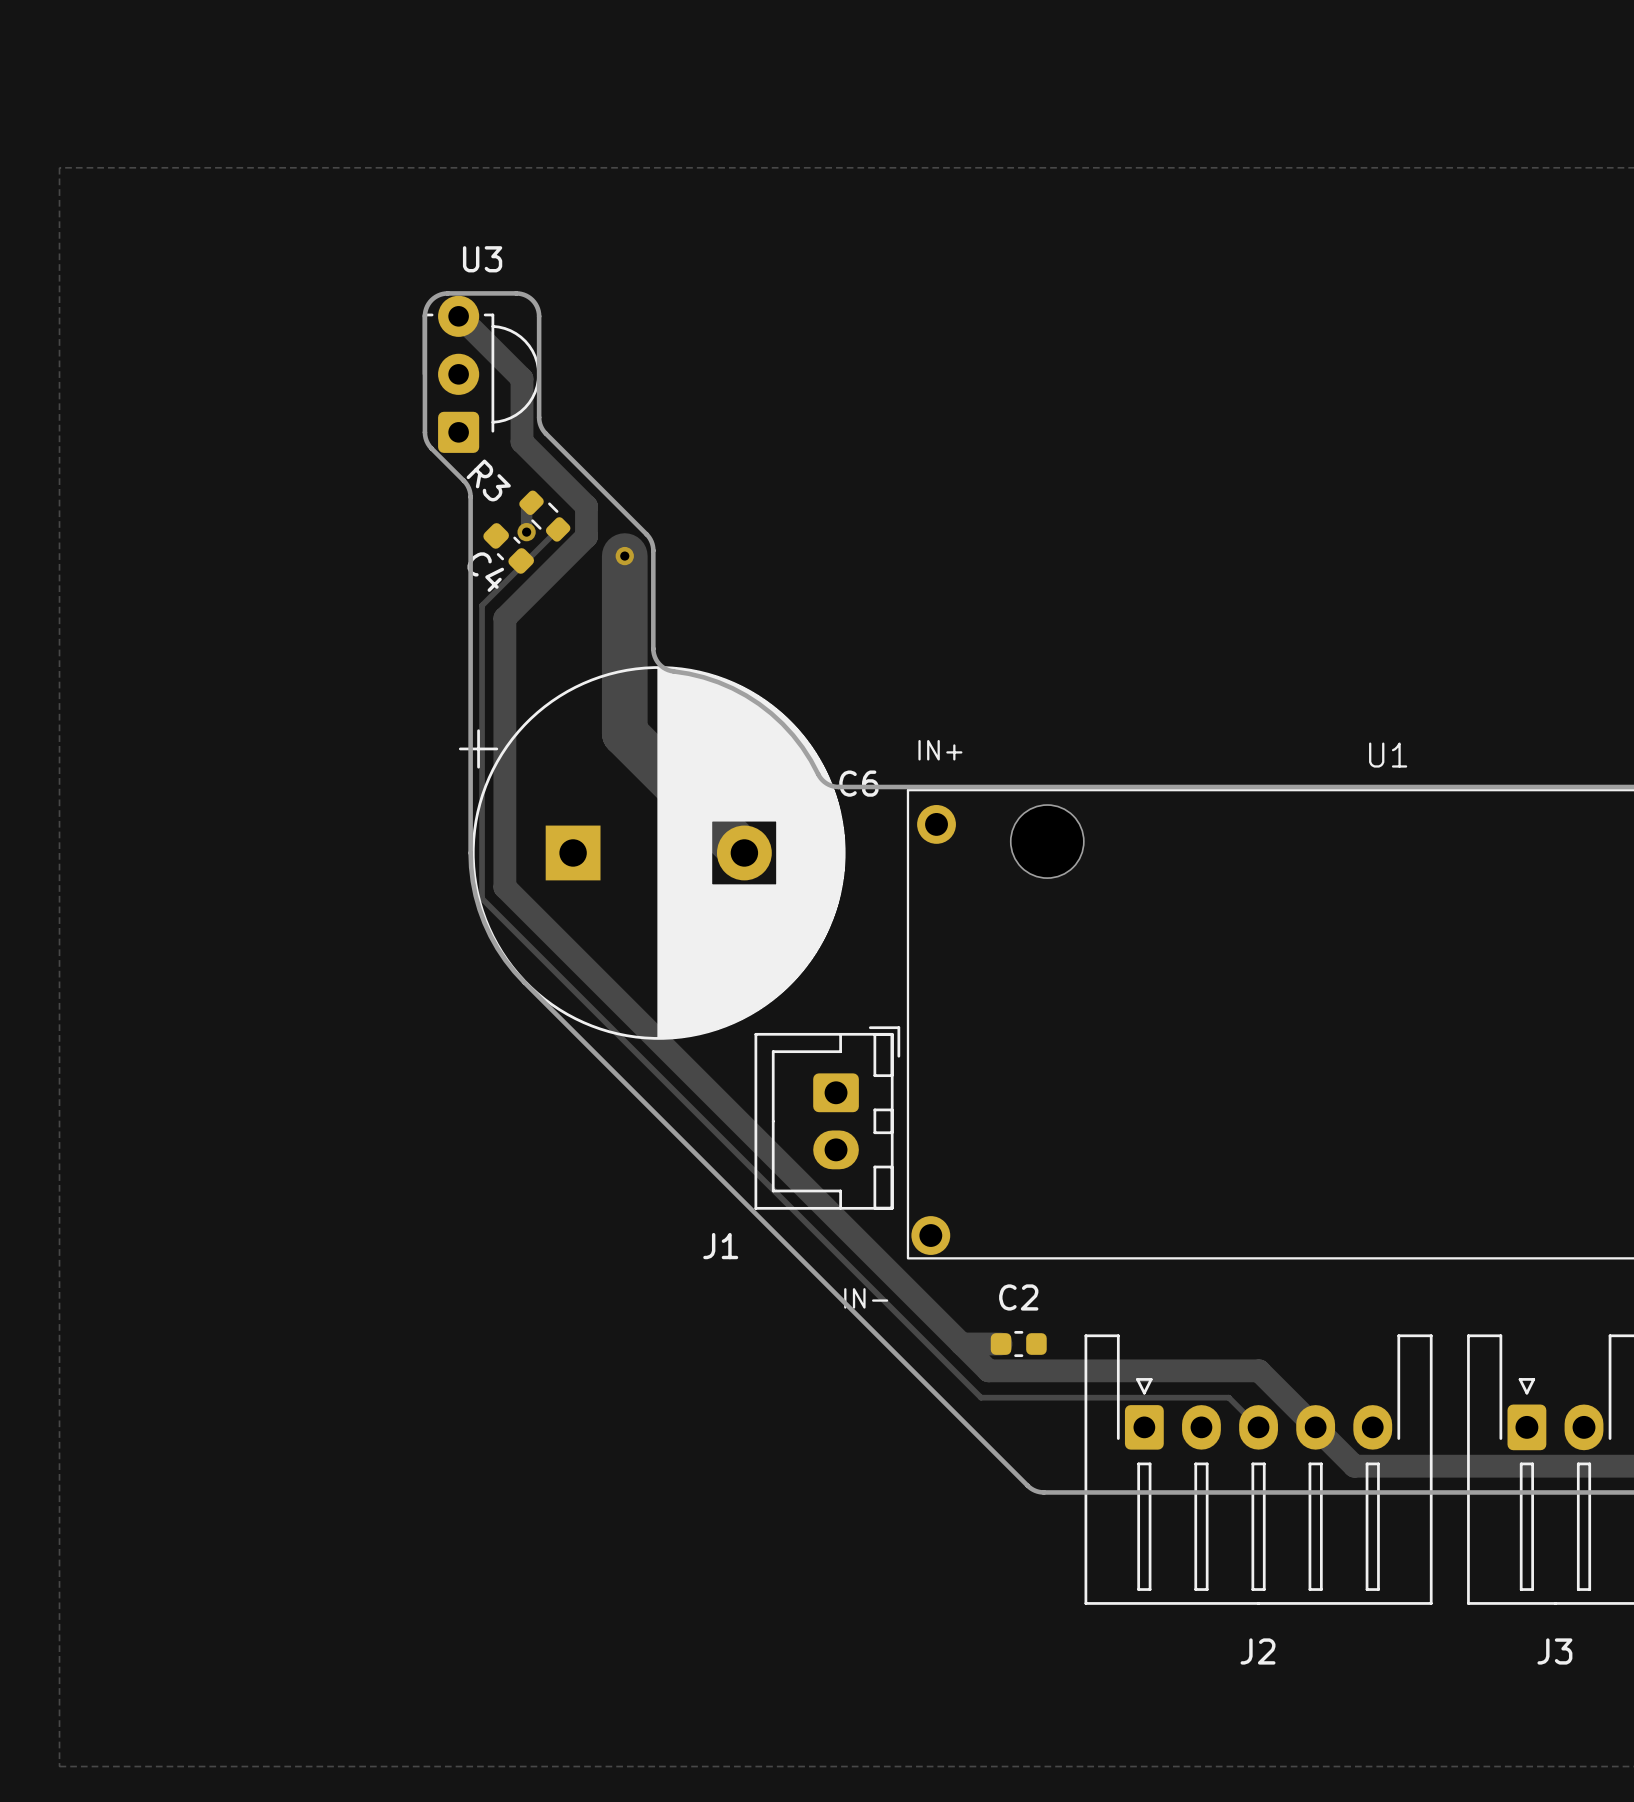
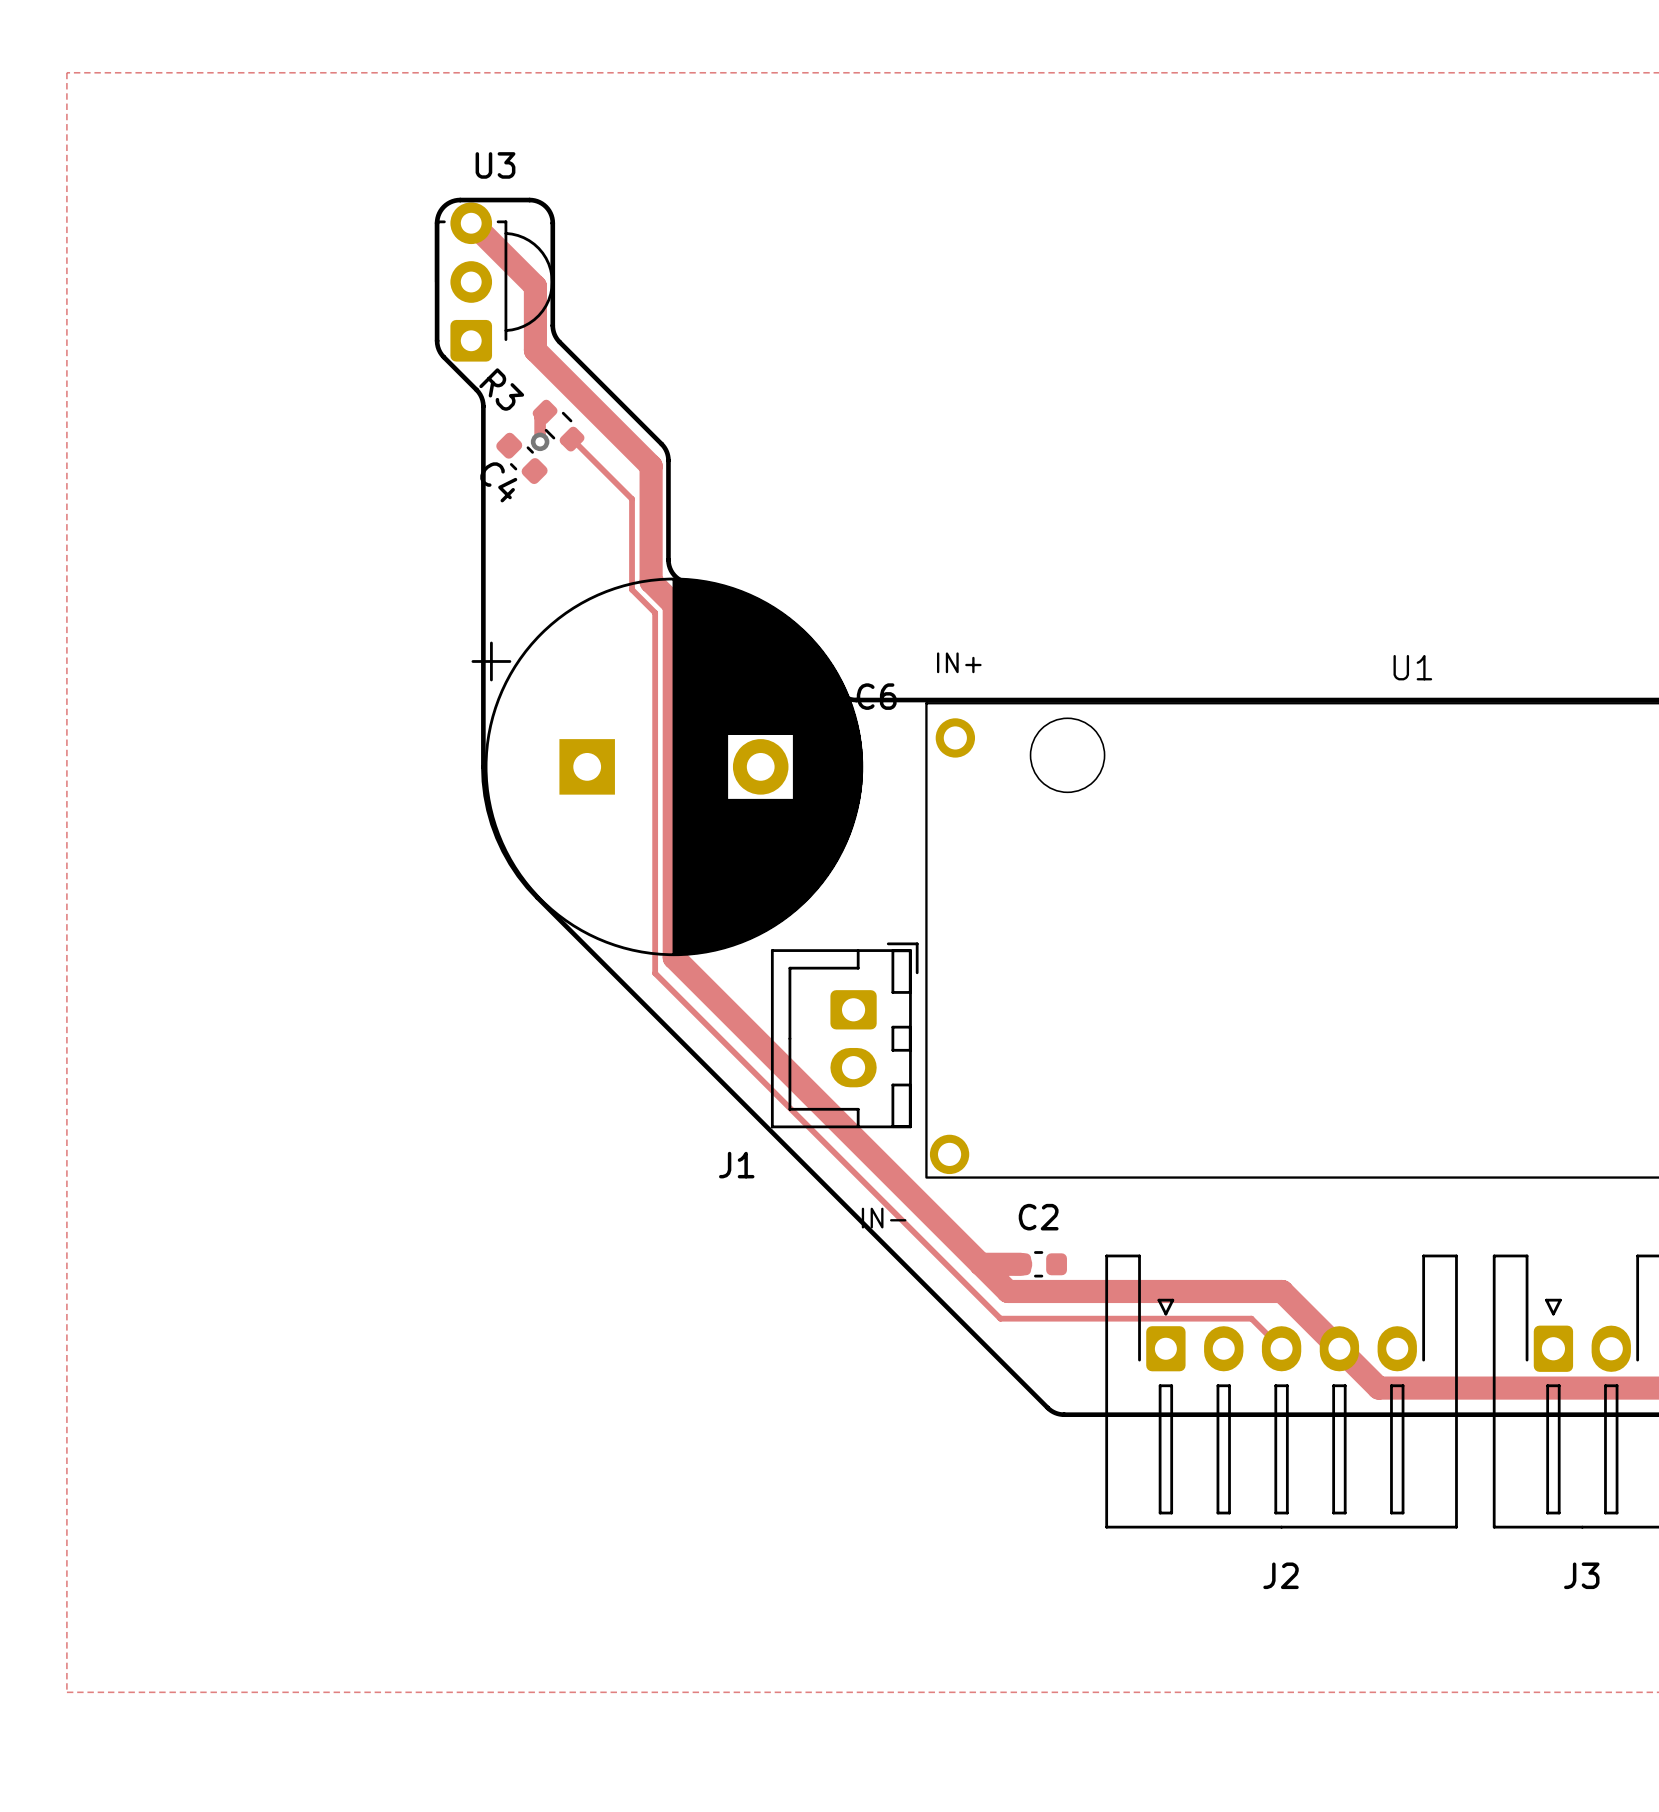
track: (586, 506) (586, 536) (504, 618) (504, 887) (659, 1041) -> (600, 415) (651, 466) (651, 581) (674, 604) (674, 957)
track: (558, 529) (482, 605) (482, 898) (640, 1056) -> (572, 439) (632, 499) (632, 589) (655, 612) (655, 973)
track: (624, 556) (624, 733) (744, 852) -> none
via: (624, 556) -> none

